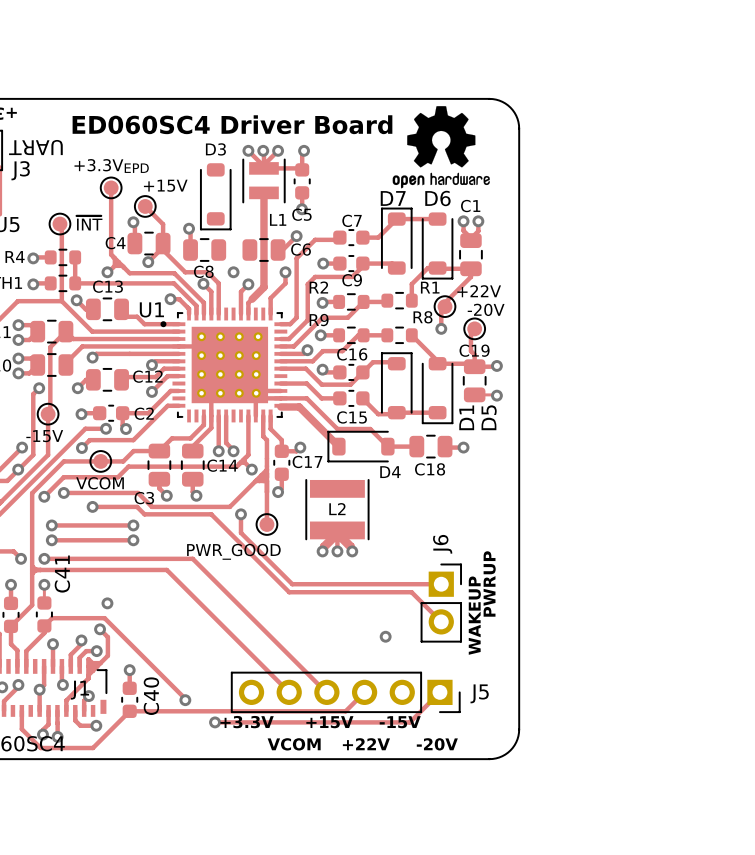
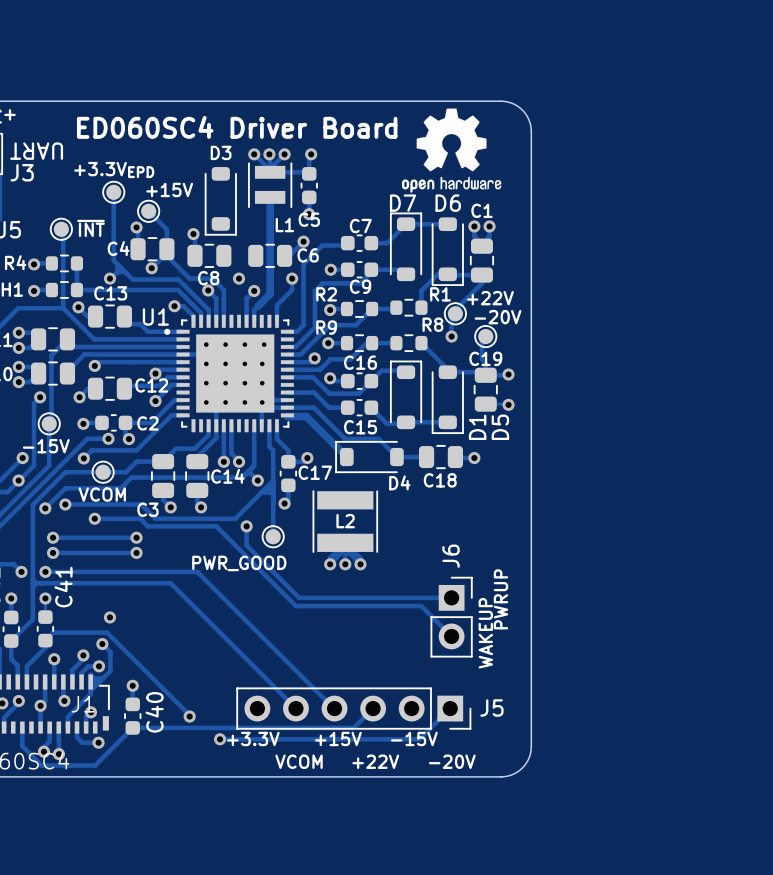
via: (385, 636) -> none

